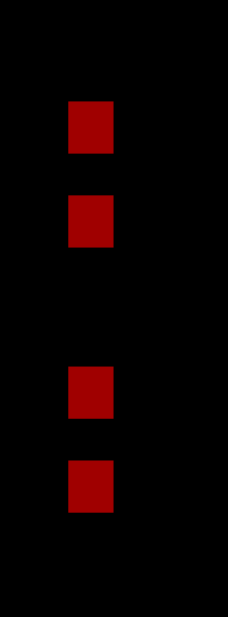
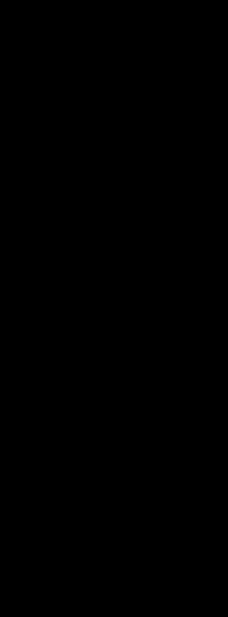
part: (90, 174) -> none
part: (90, 439) -> none

